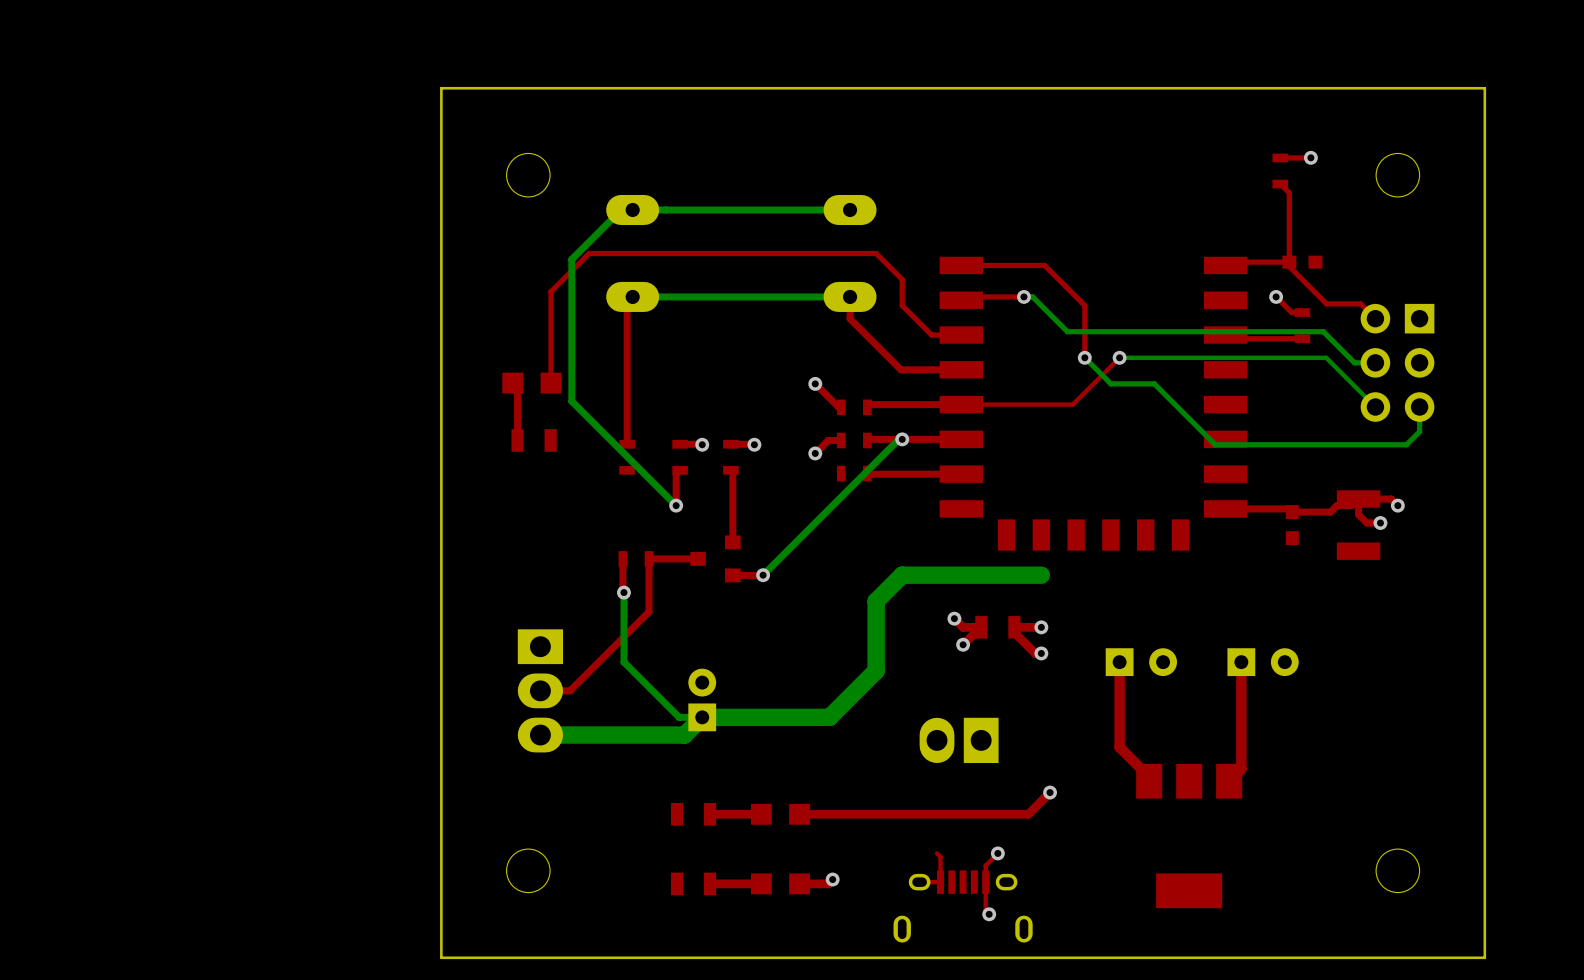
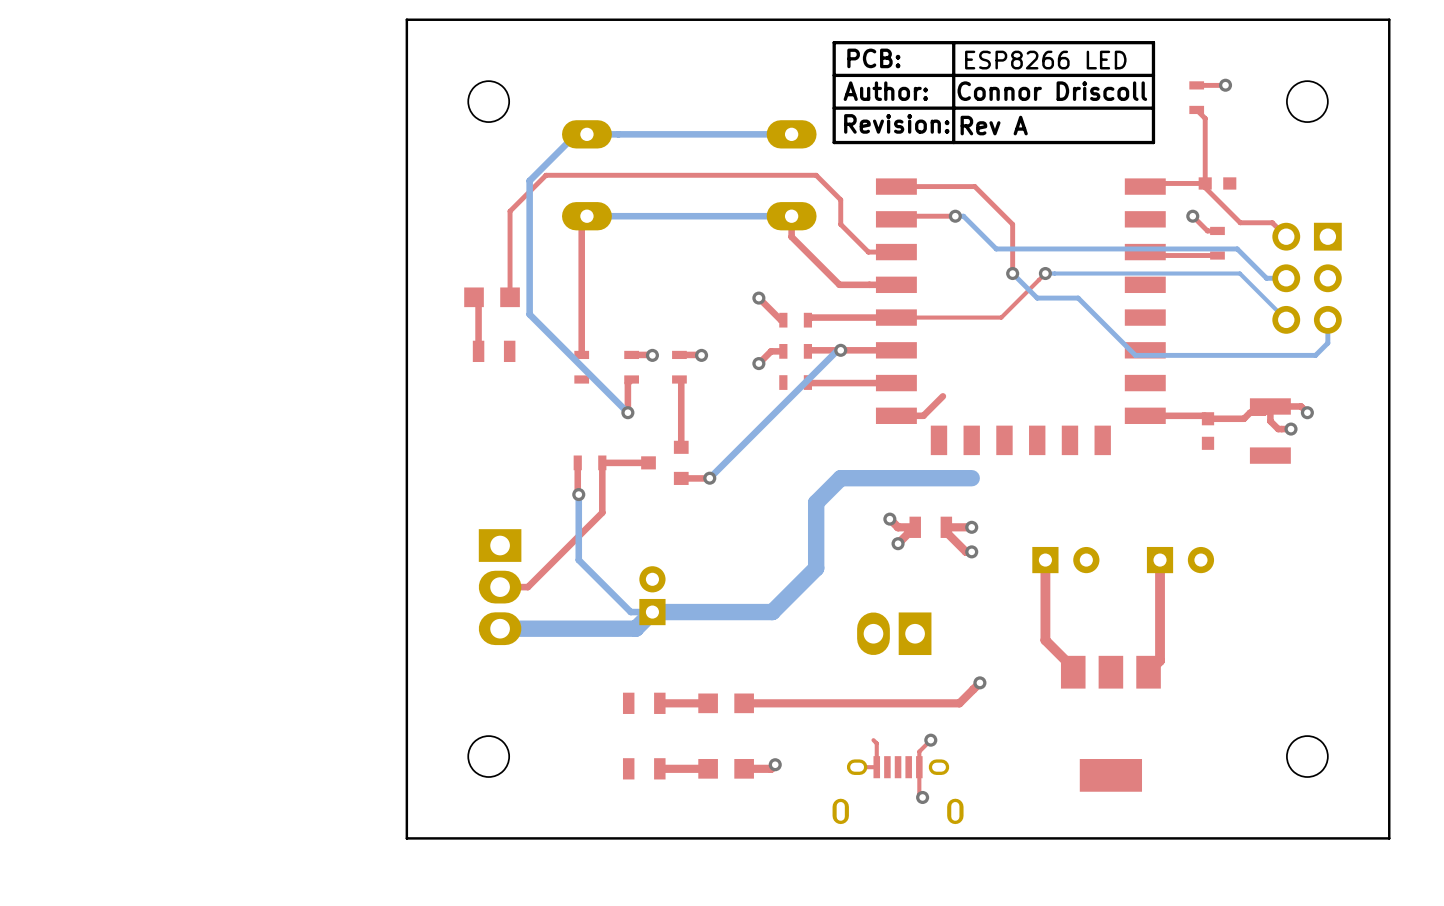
line: none -> (953, 42) (953, 142)
line: none -> (1153, 42) (834, 42) (834, 142) (1153, 142) (1153, 42)
text: none -> PCB: (873, 58)
text: none -> ESP8266 LED (1045, 60)
line: none -> (1153, 75) (834, 75)
text: none -> Author: (885, 91)
text: none -> Connor Driscoll (1052, 91)
line: none -> (1153, 108) (834, 108)
text: none -> Revision: (896, 123)
text: none -> Rev A (994, 125)
top track: none -> (942, 396) (923, 415) (896, 415)

